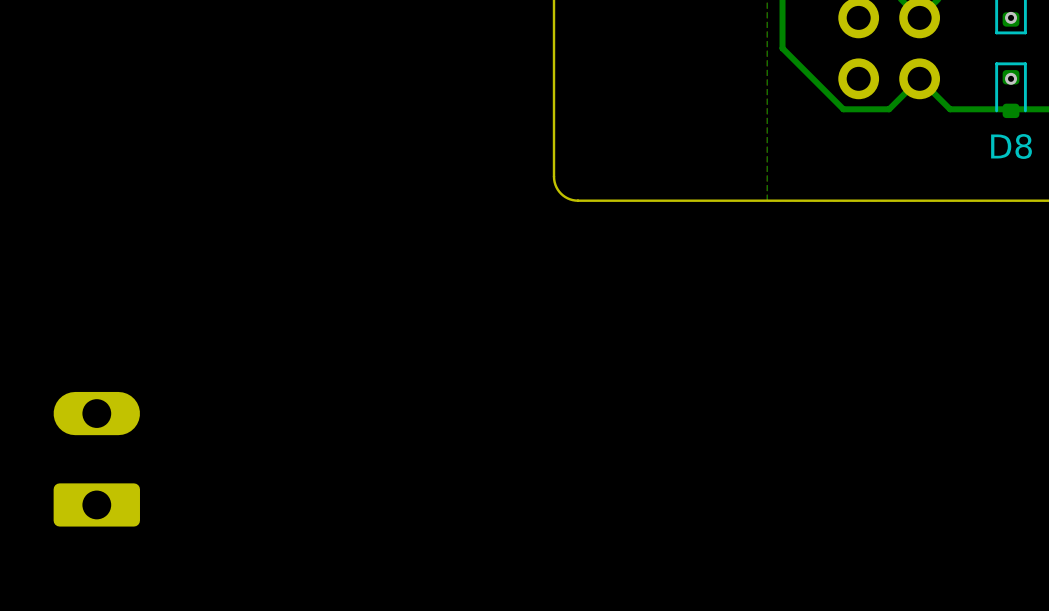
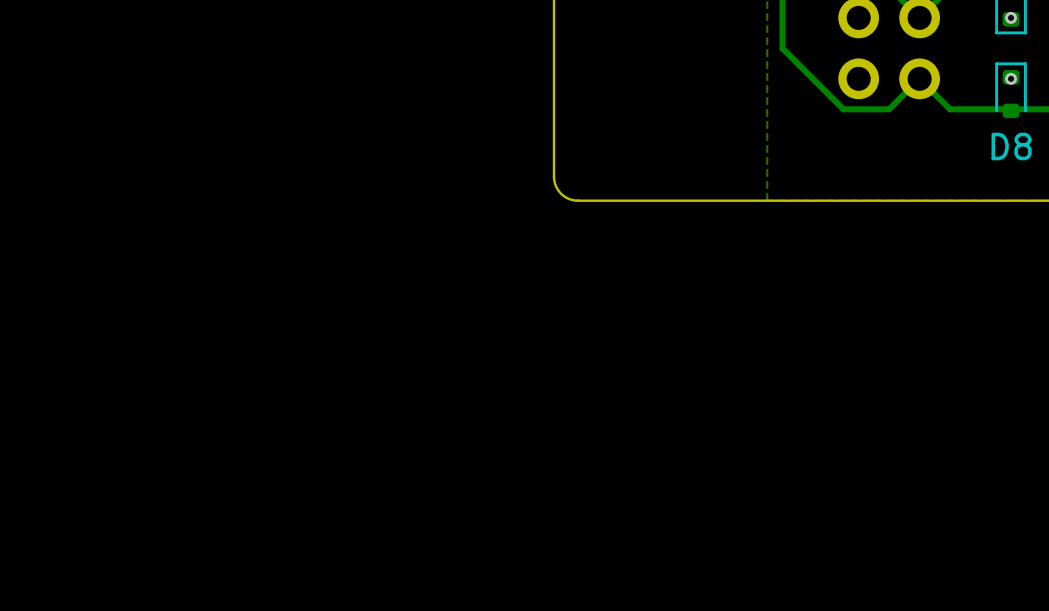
part: (96, 459) -> none

